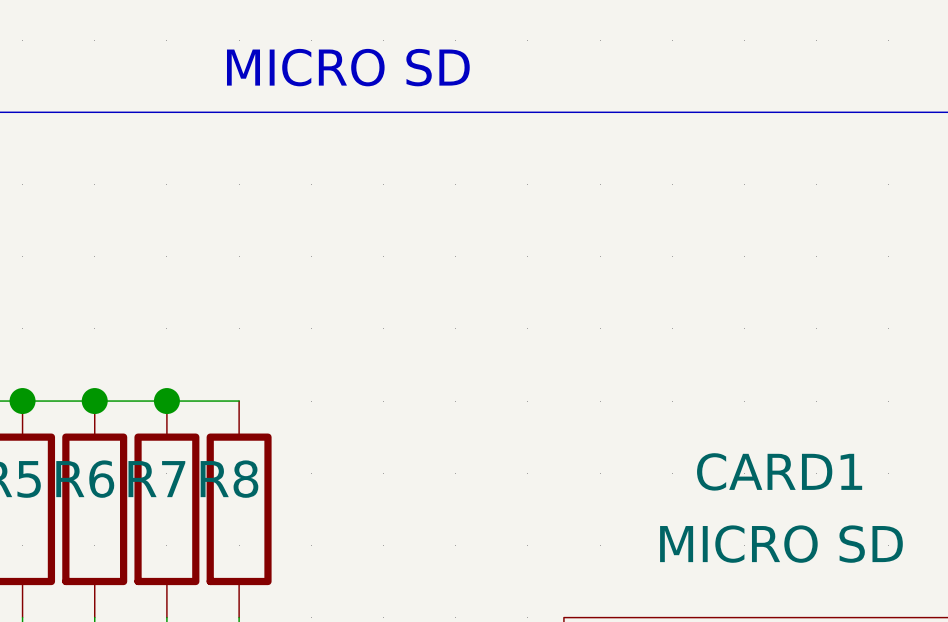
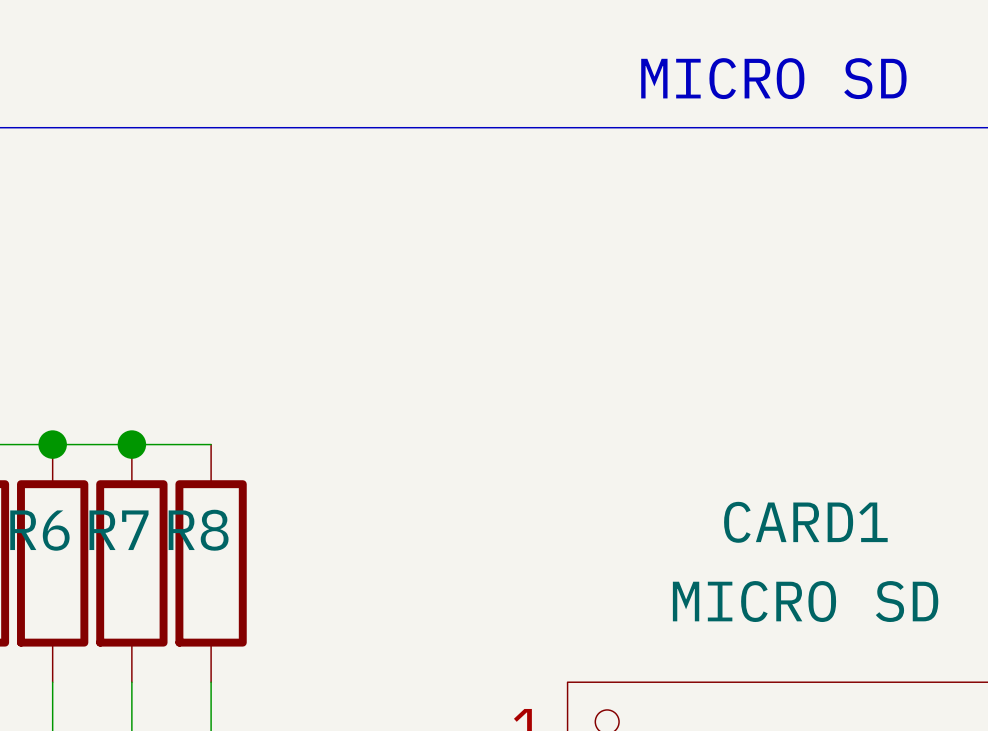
text position: MICRO SD (348, 67) -> MICRO SD (773, 78)

